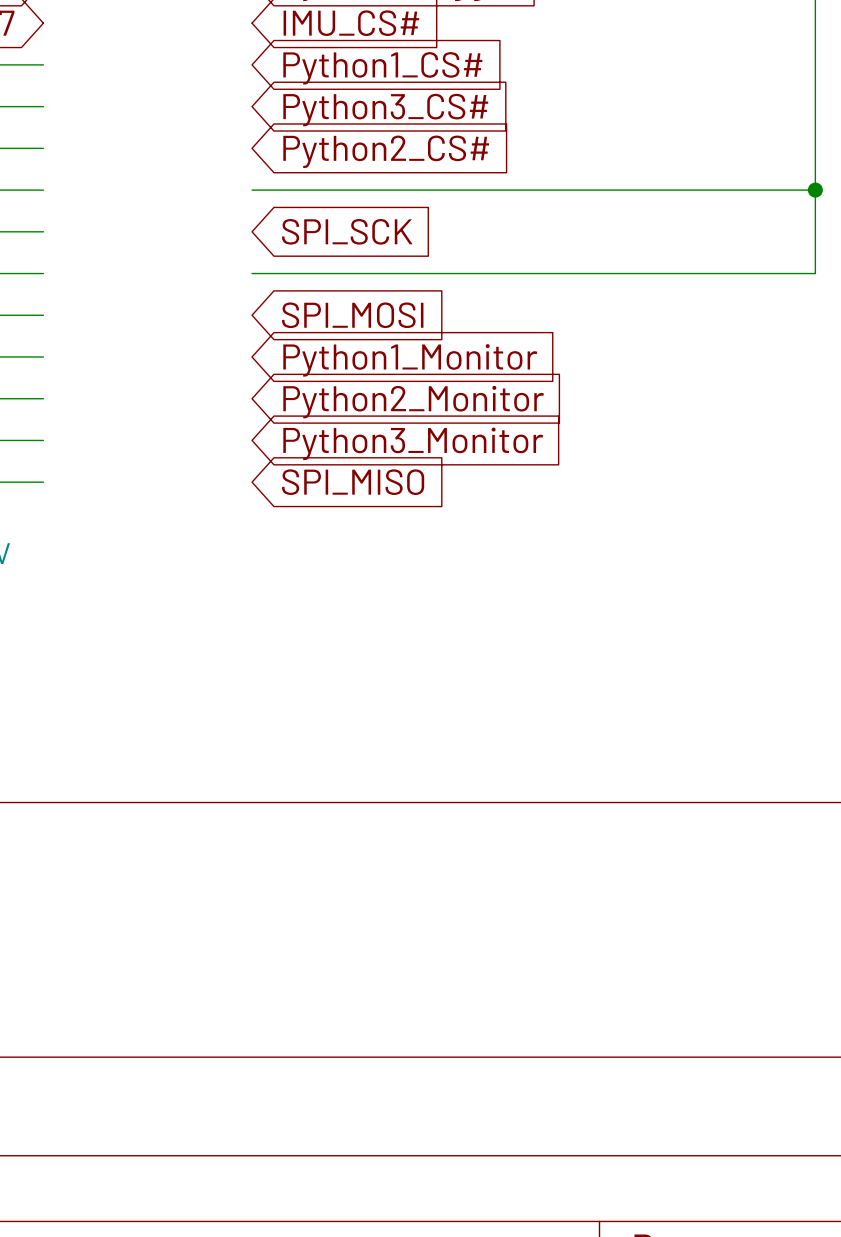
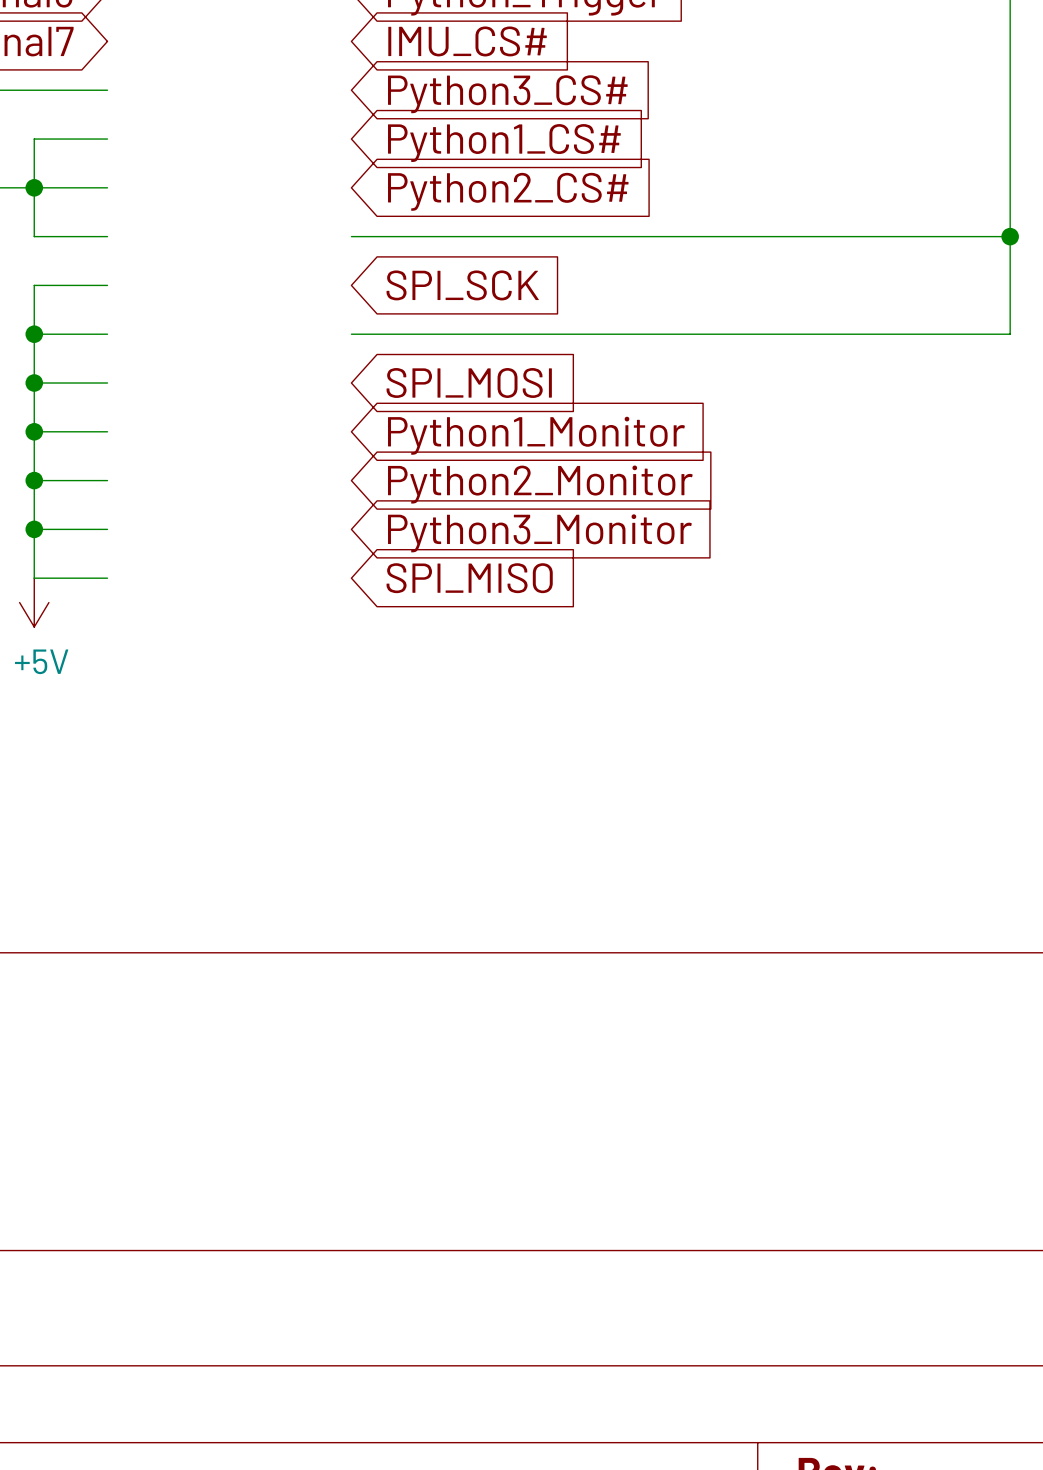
global label: Python1_CS# (382, 68) -> Python3_CS# (507, 94)
global label: Python3_CS# (385, 110) -> Python1_CS# (504, 143)

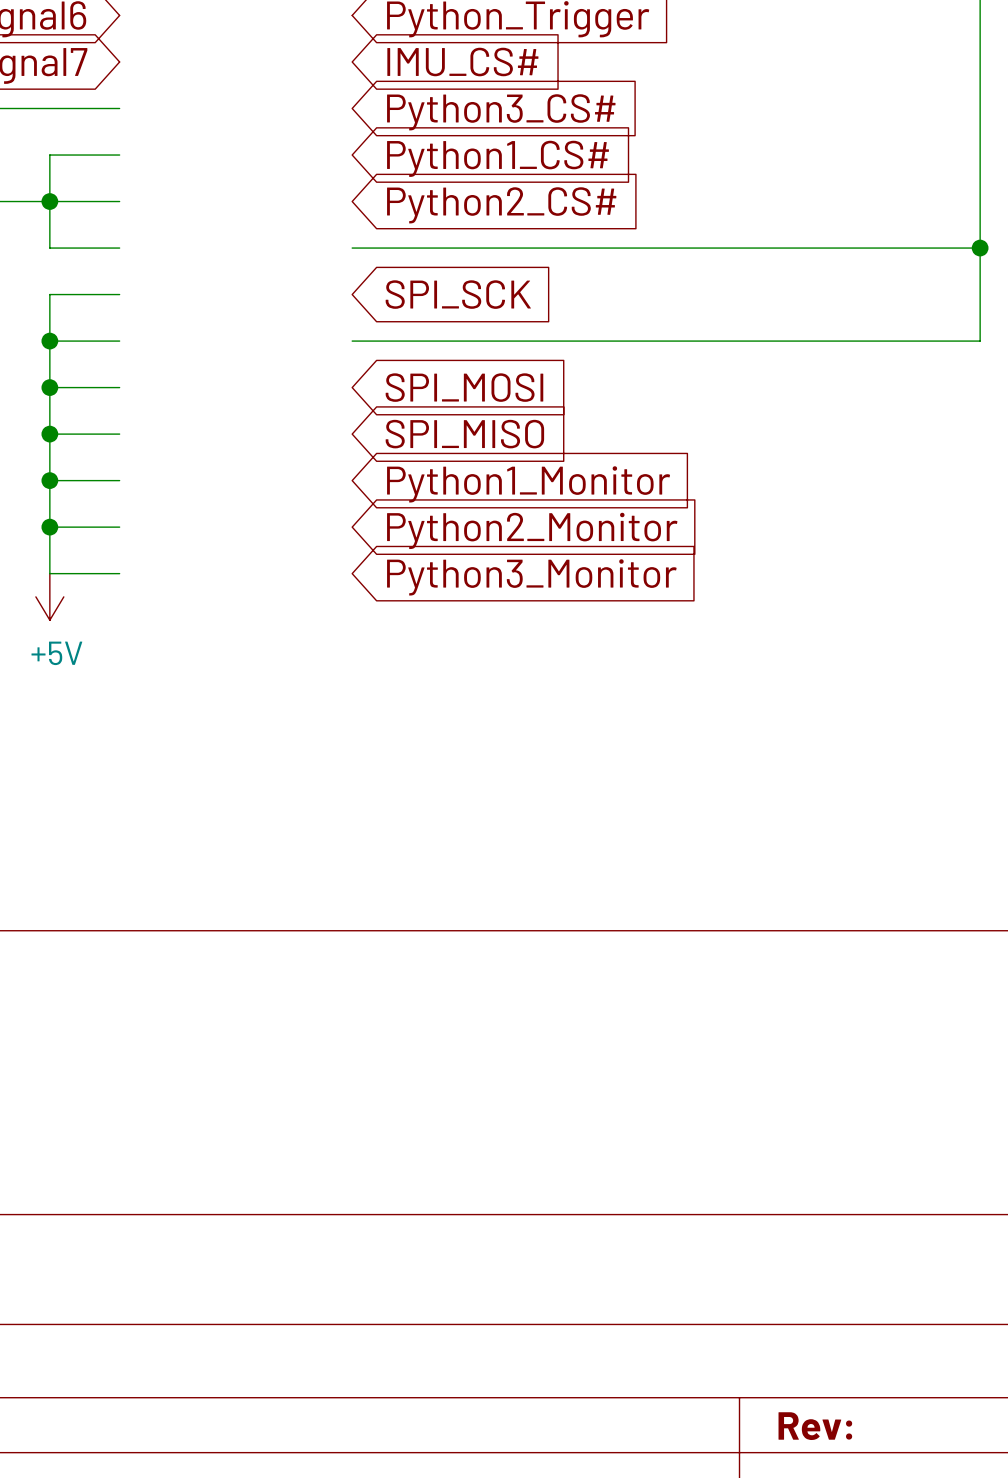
global label: Python1_Monitor (536, 435) -> SPI_MISO (464, 434)
global label: Python2_Monitor (540, 484) -> Python1_Monitor (528, 484)
global label: Python3_Monitor (539, 533) -> Python2_Monitor (532, 530)
global label: SPI_MISO (469, 578) -> Python3_Monitor (531, 577)

